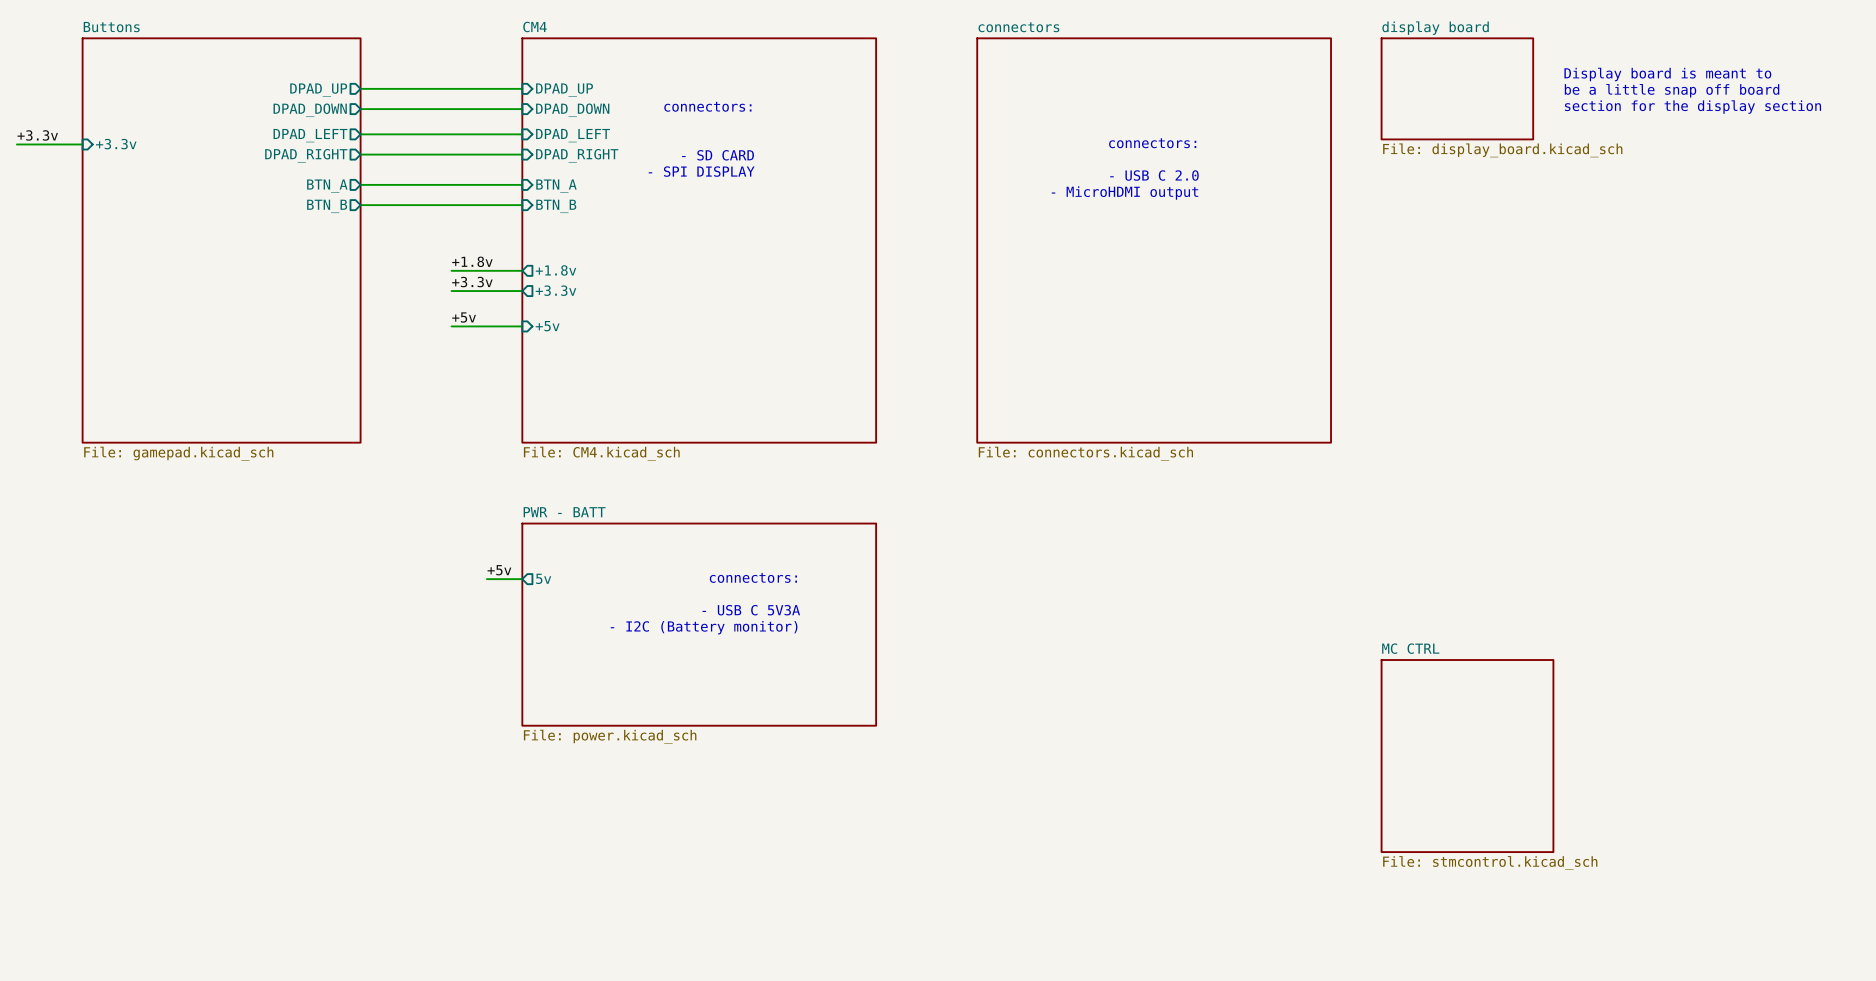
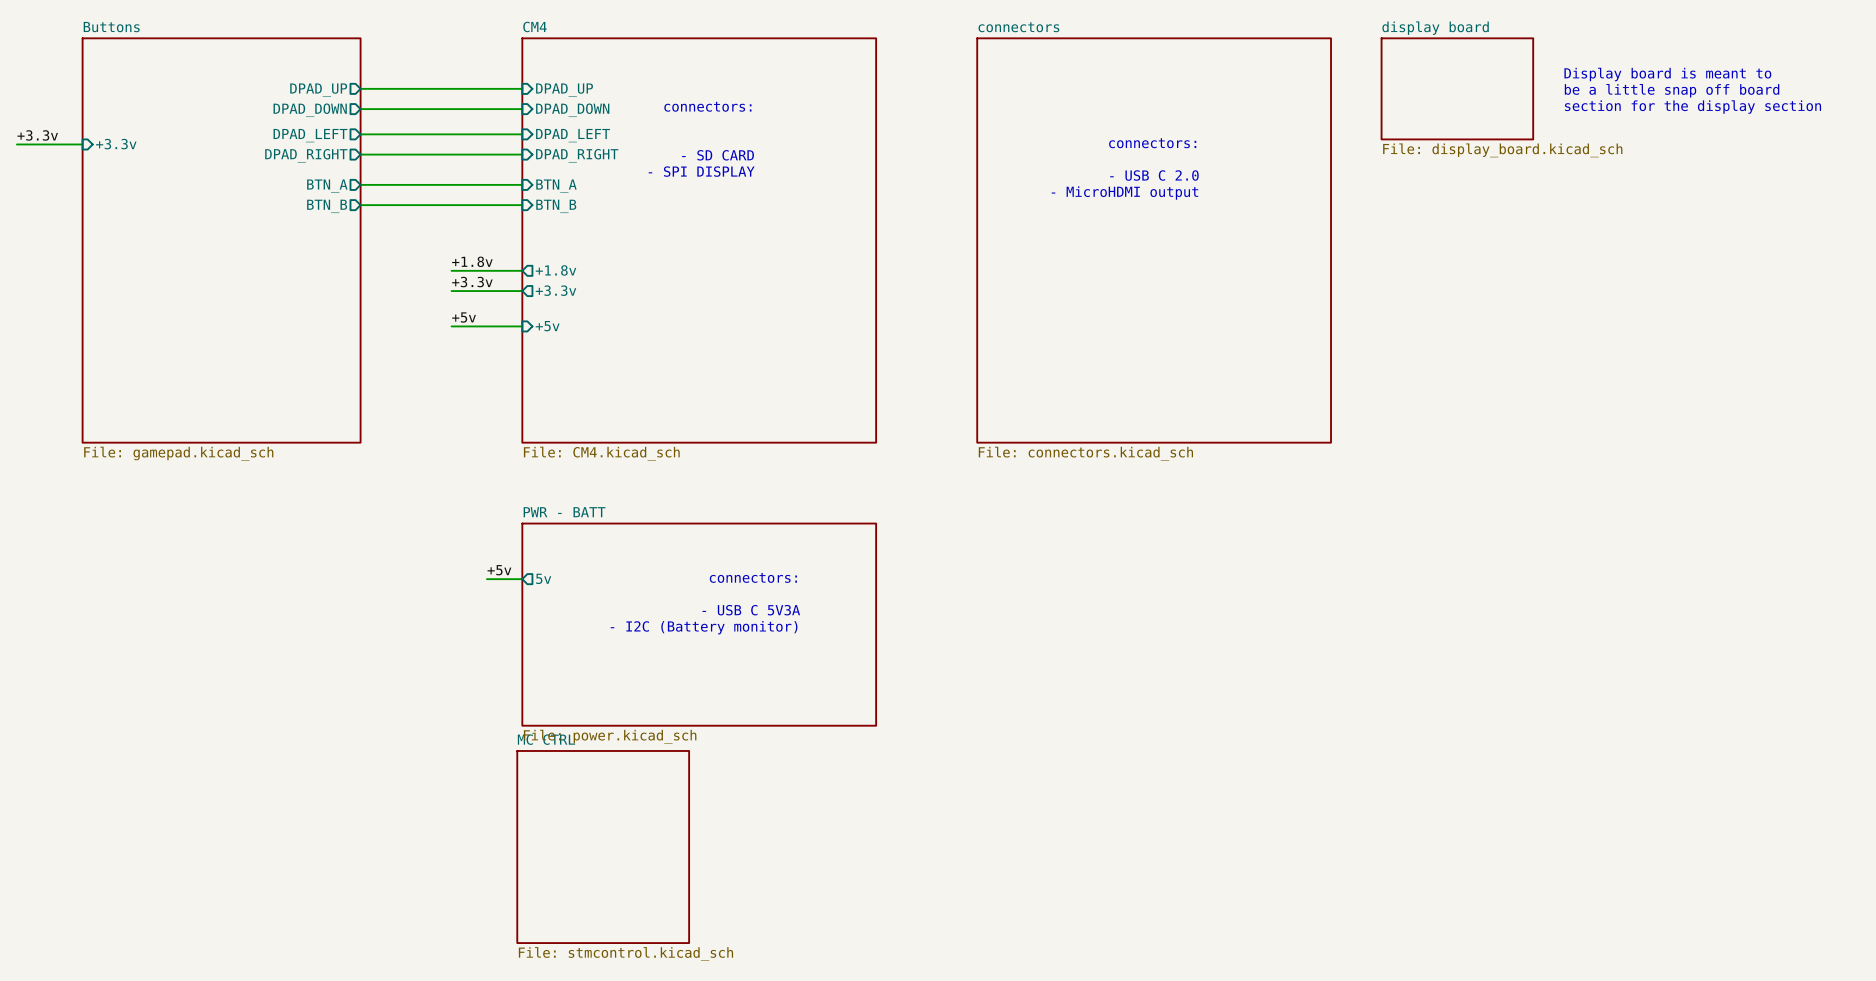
sheet MC CTRL: File: stmcontrol.kicad_sch (1467, 756) -> none
sheet MC CTRL: none -> File: stmcontrol.kicad_sch (603, 847)

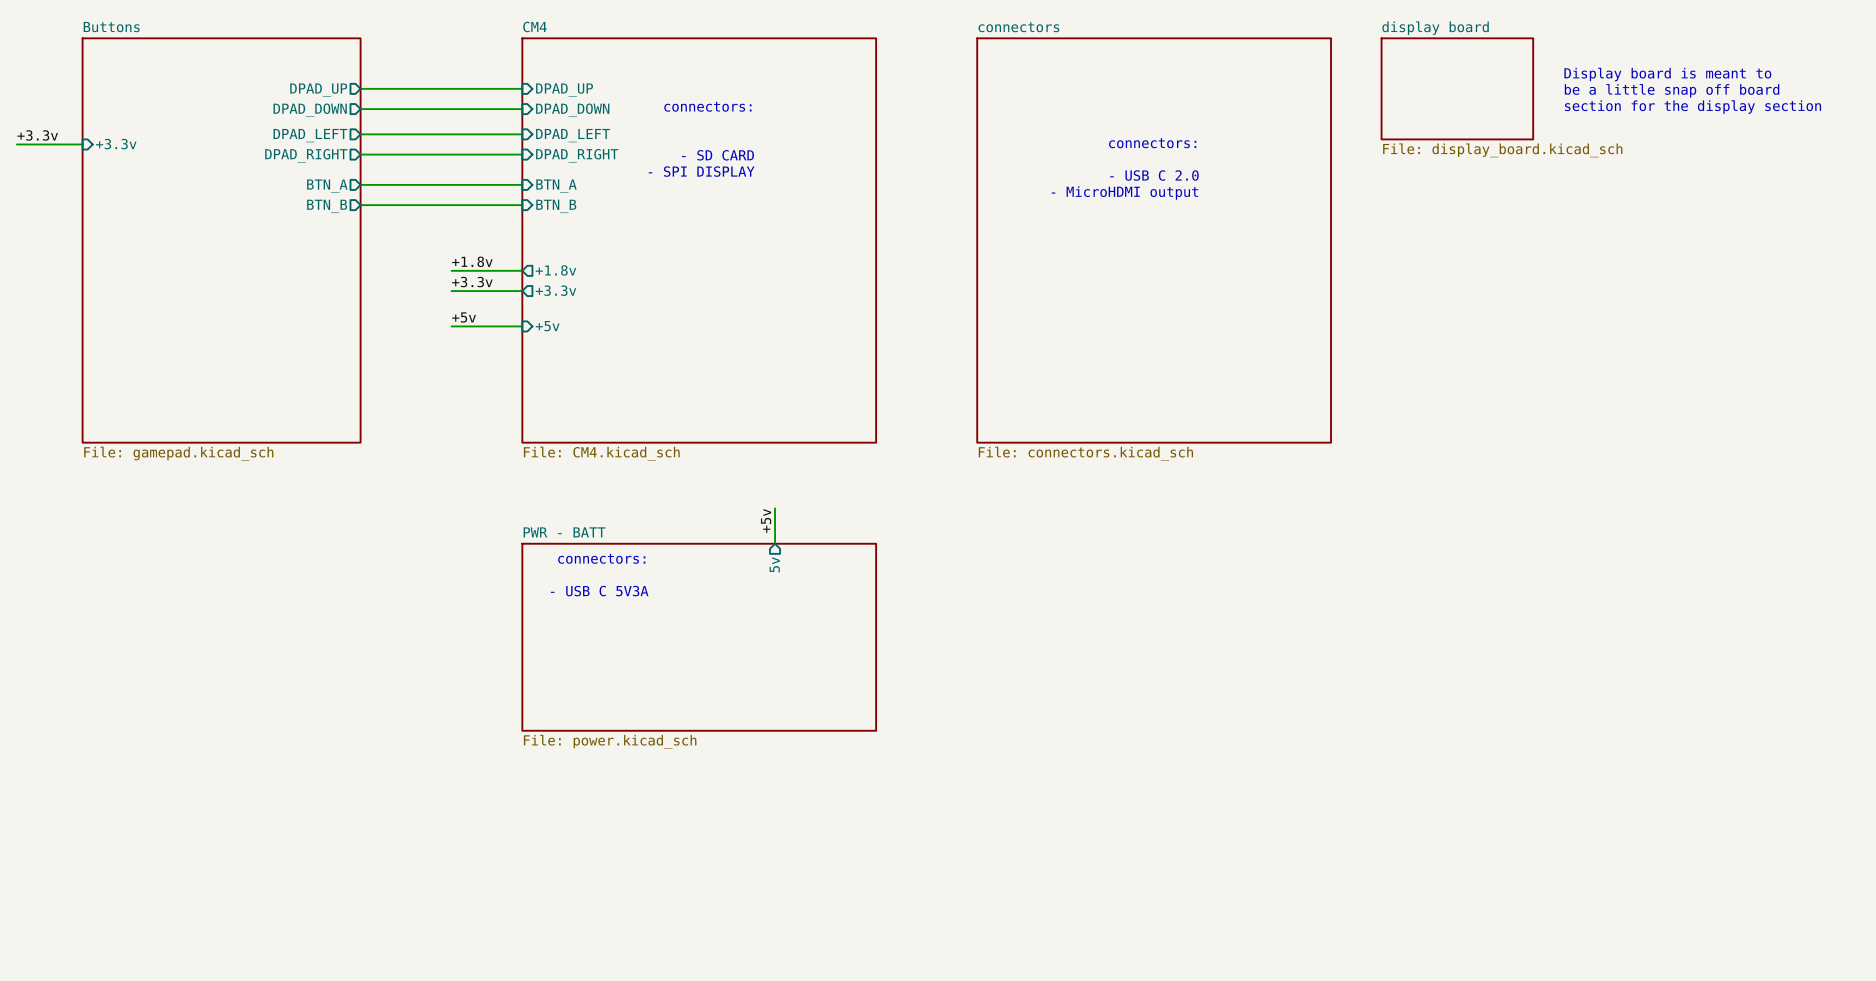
wire: none -> (775, 508) (775, 543)
label: none -> +5v (766, 520)
sheet pin: none -> 5v (774, 564)
label: +5v (499, 570) -> none
text position: connectors: (753, 577) -> connectors: (601, 558)
sheet pin: 5v (543, 578) -> none
wire: (486, 579) (522, 579) -> none
text position: - USB C 5V3A (751, 610) -> - USB C 5V3A (599, 591)
sheet PWR - BATT: File: power.kicad_sch (699, 624) -> none
text: - I2C (Battery monitor) (704, 627) -> none
sheet PWR - BATT: none -> File: power.kicad_sch (699, 637)
sheet MC CTRL: File: stmcontrol.kicad_sch (603, 847) -> none

